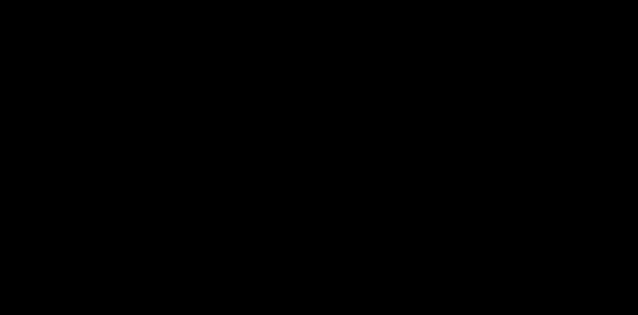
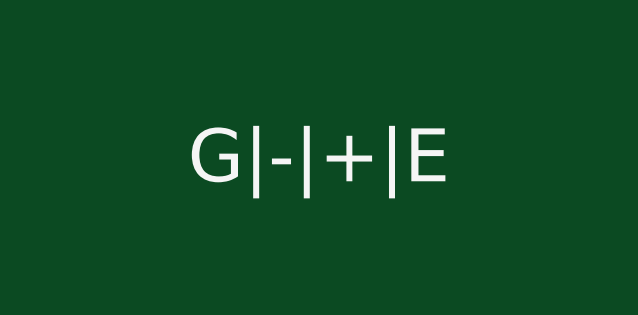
text: none -> G|-|+|E (318, 162)

